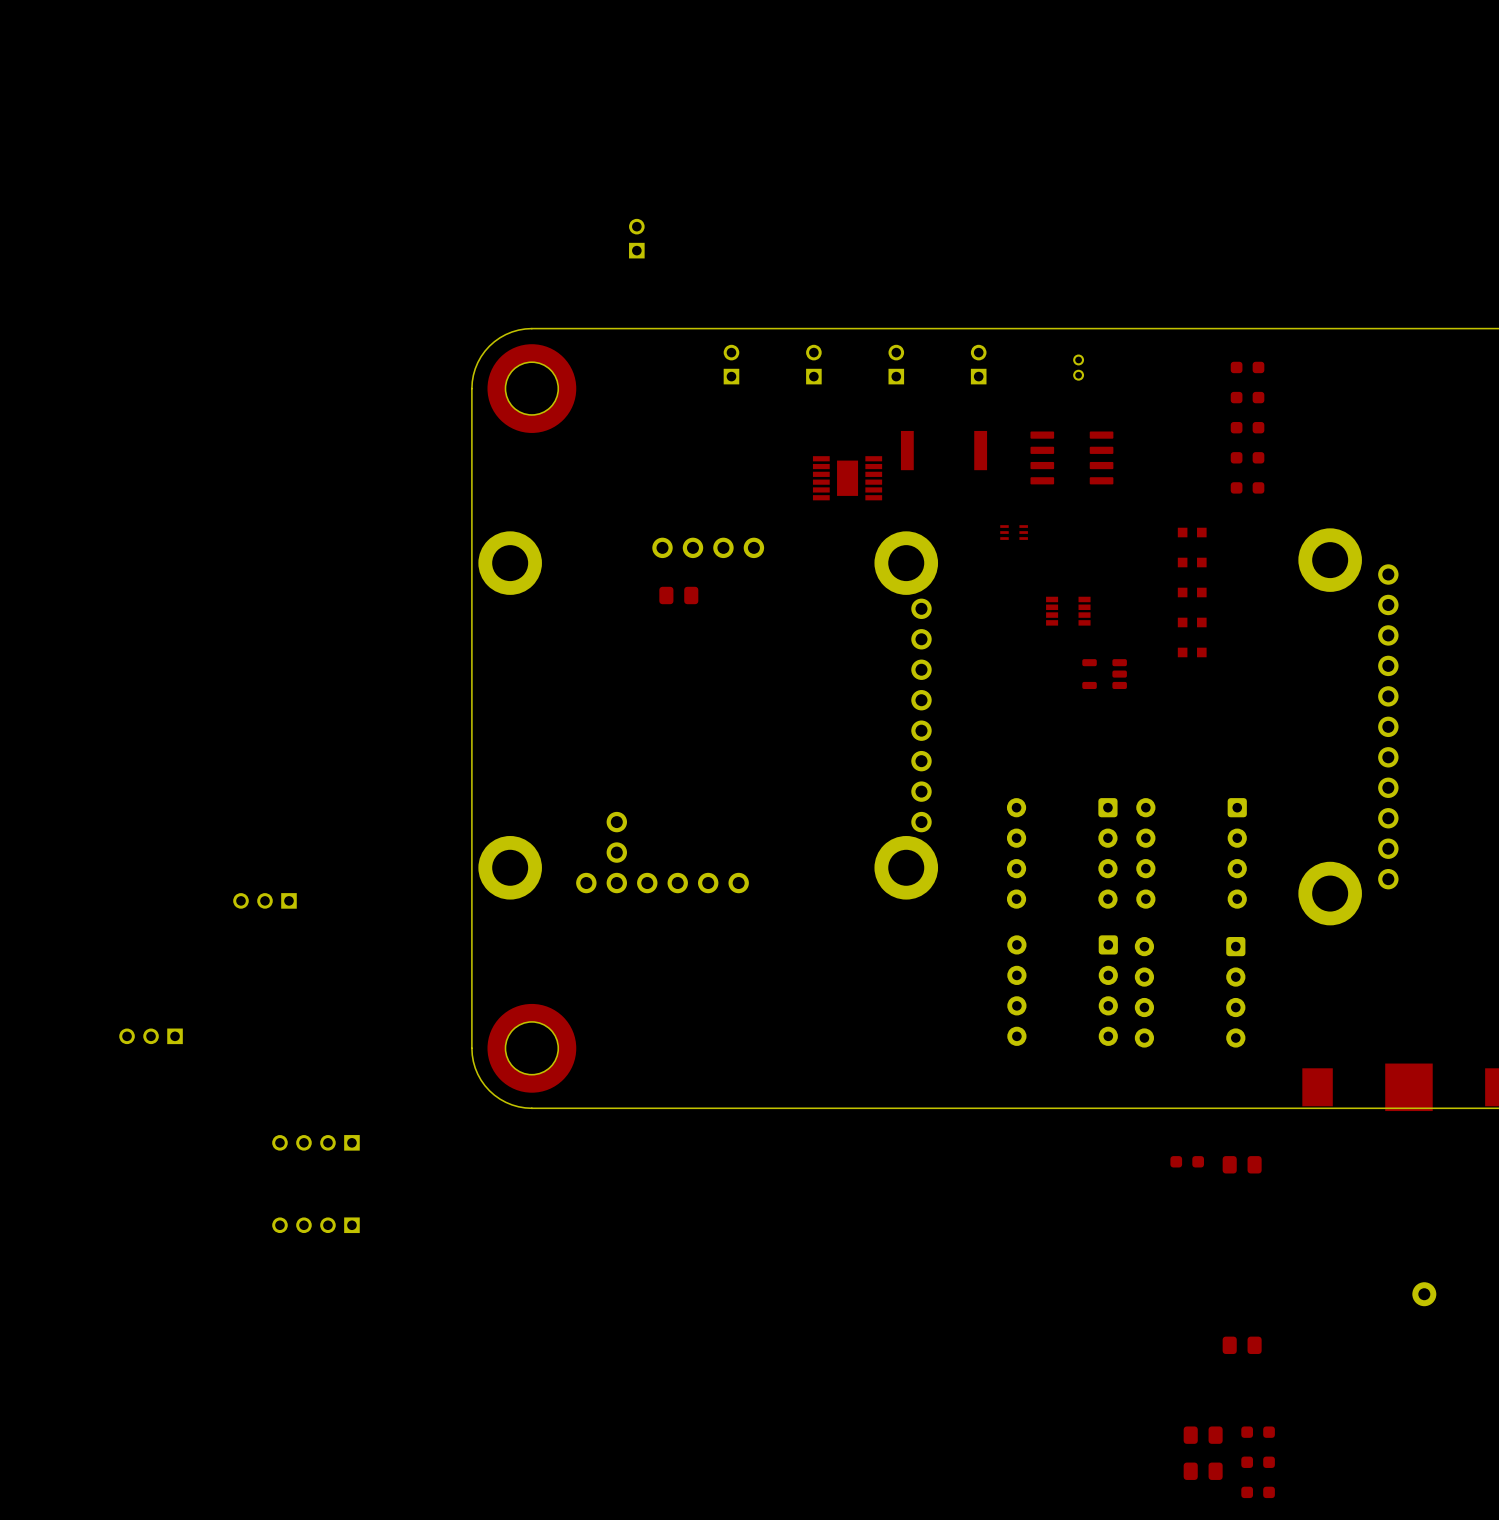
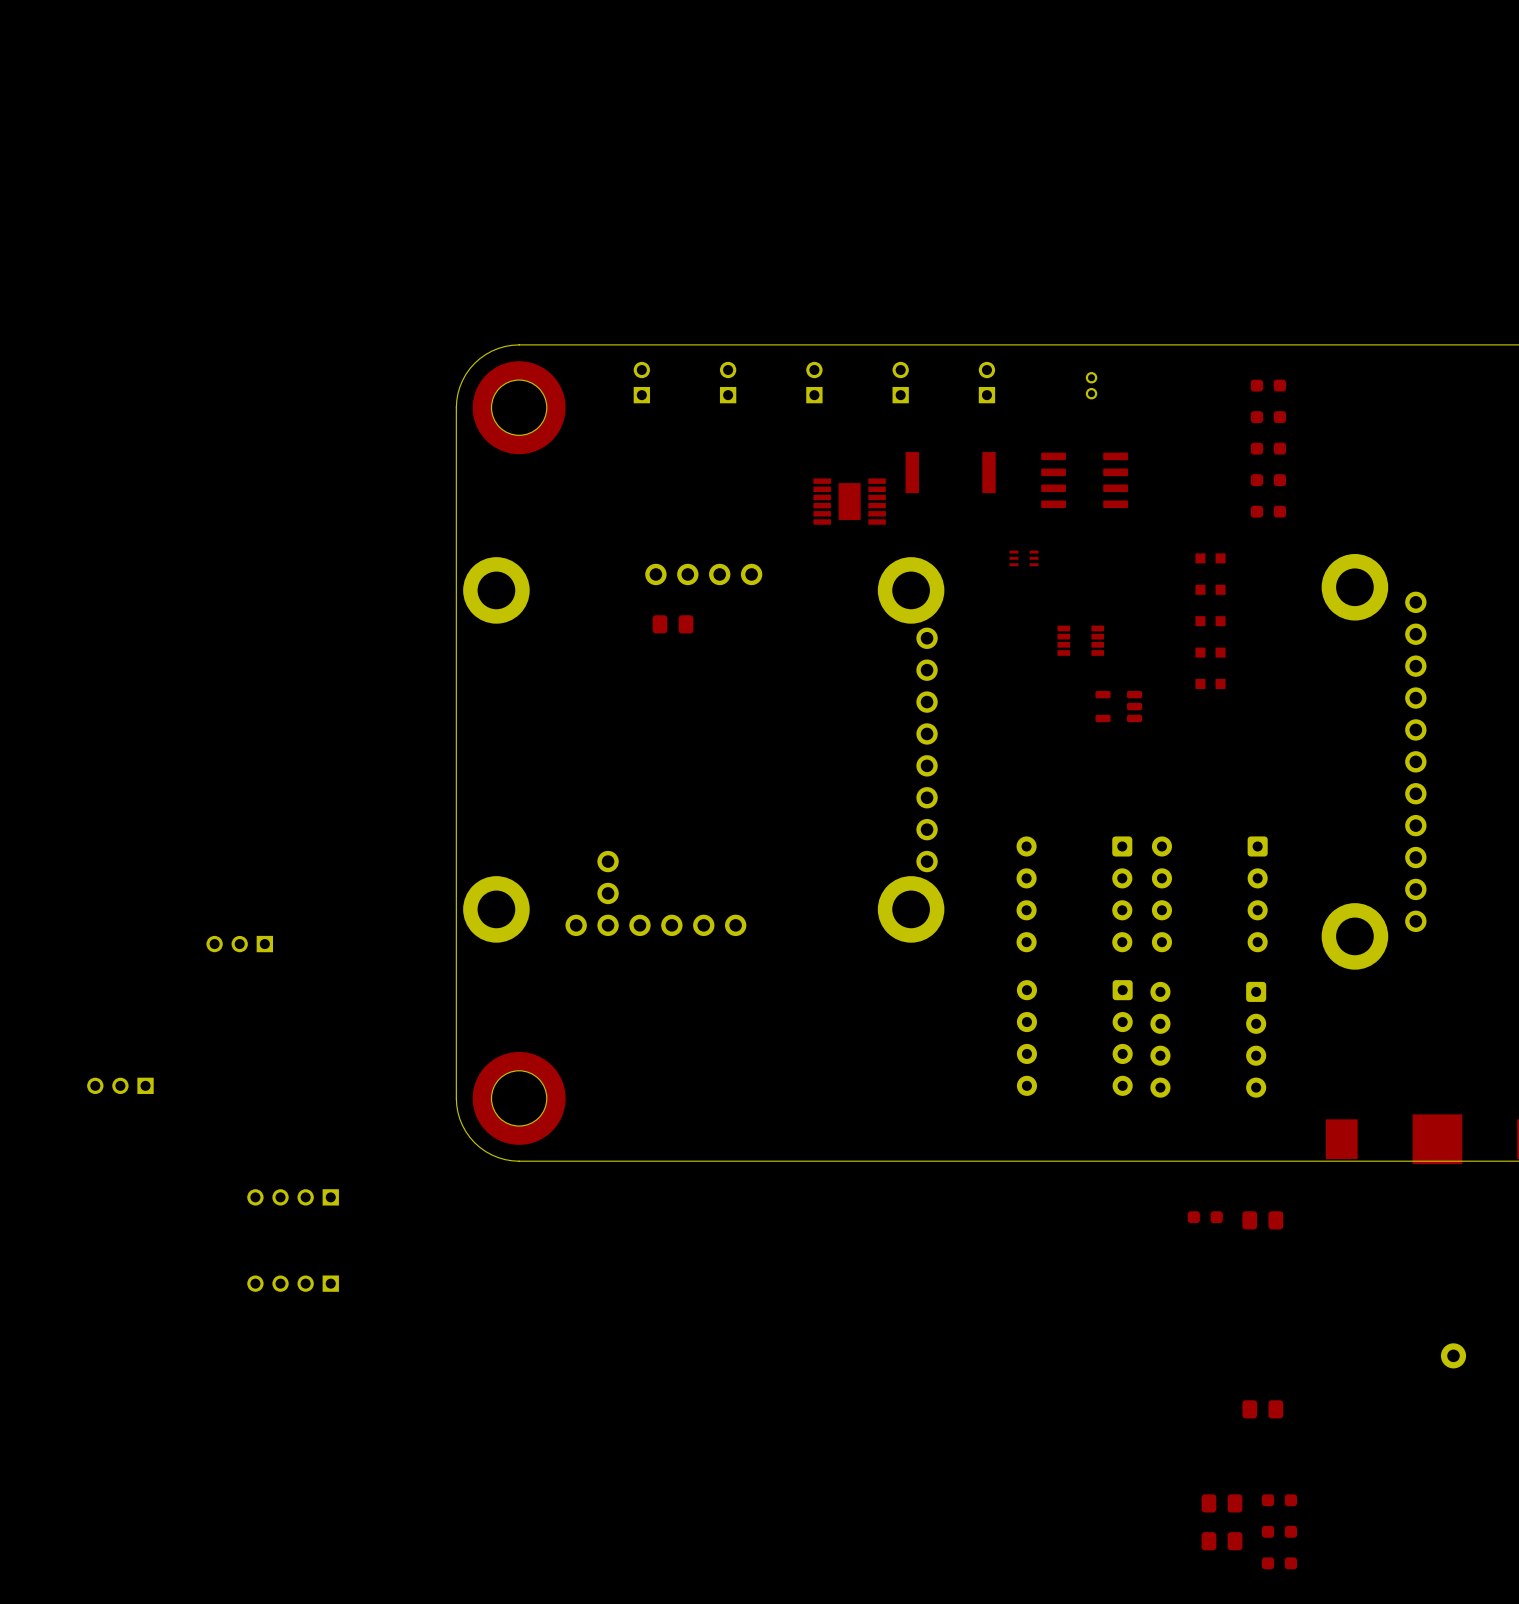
part position: (636, 238) -> (641, 382)

